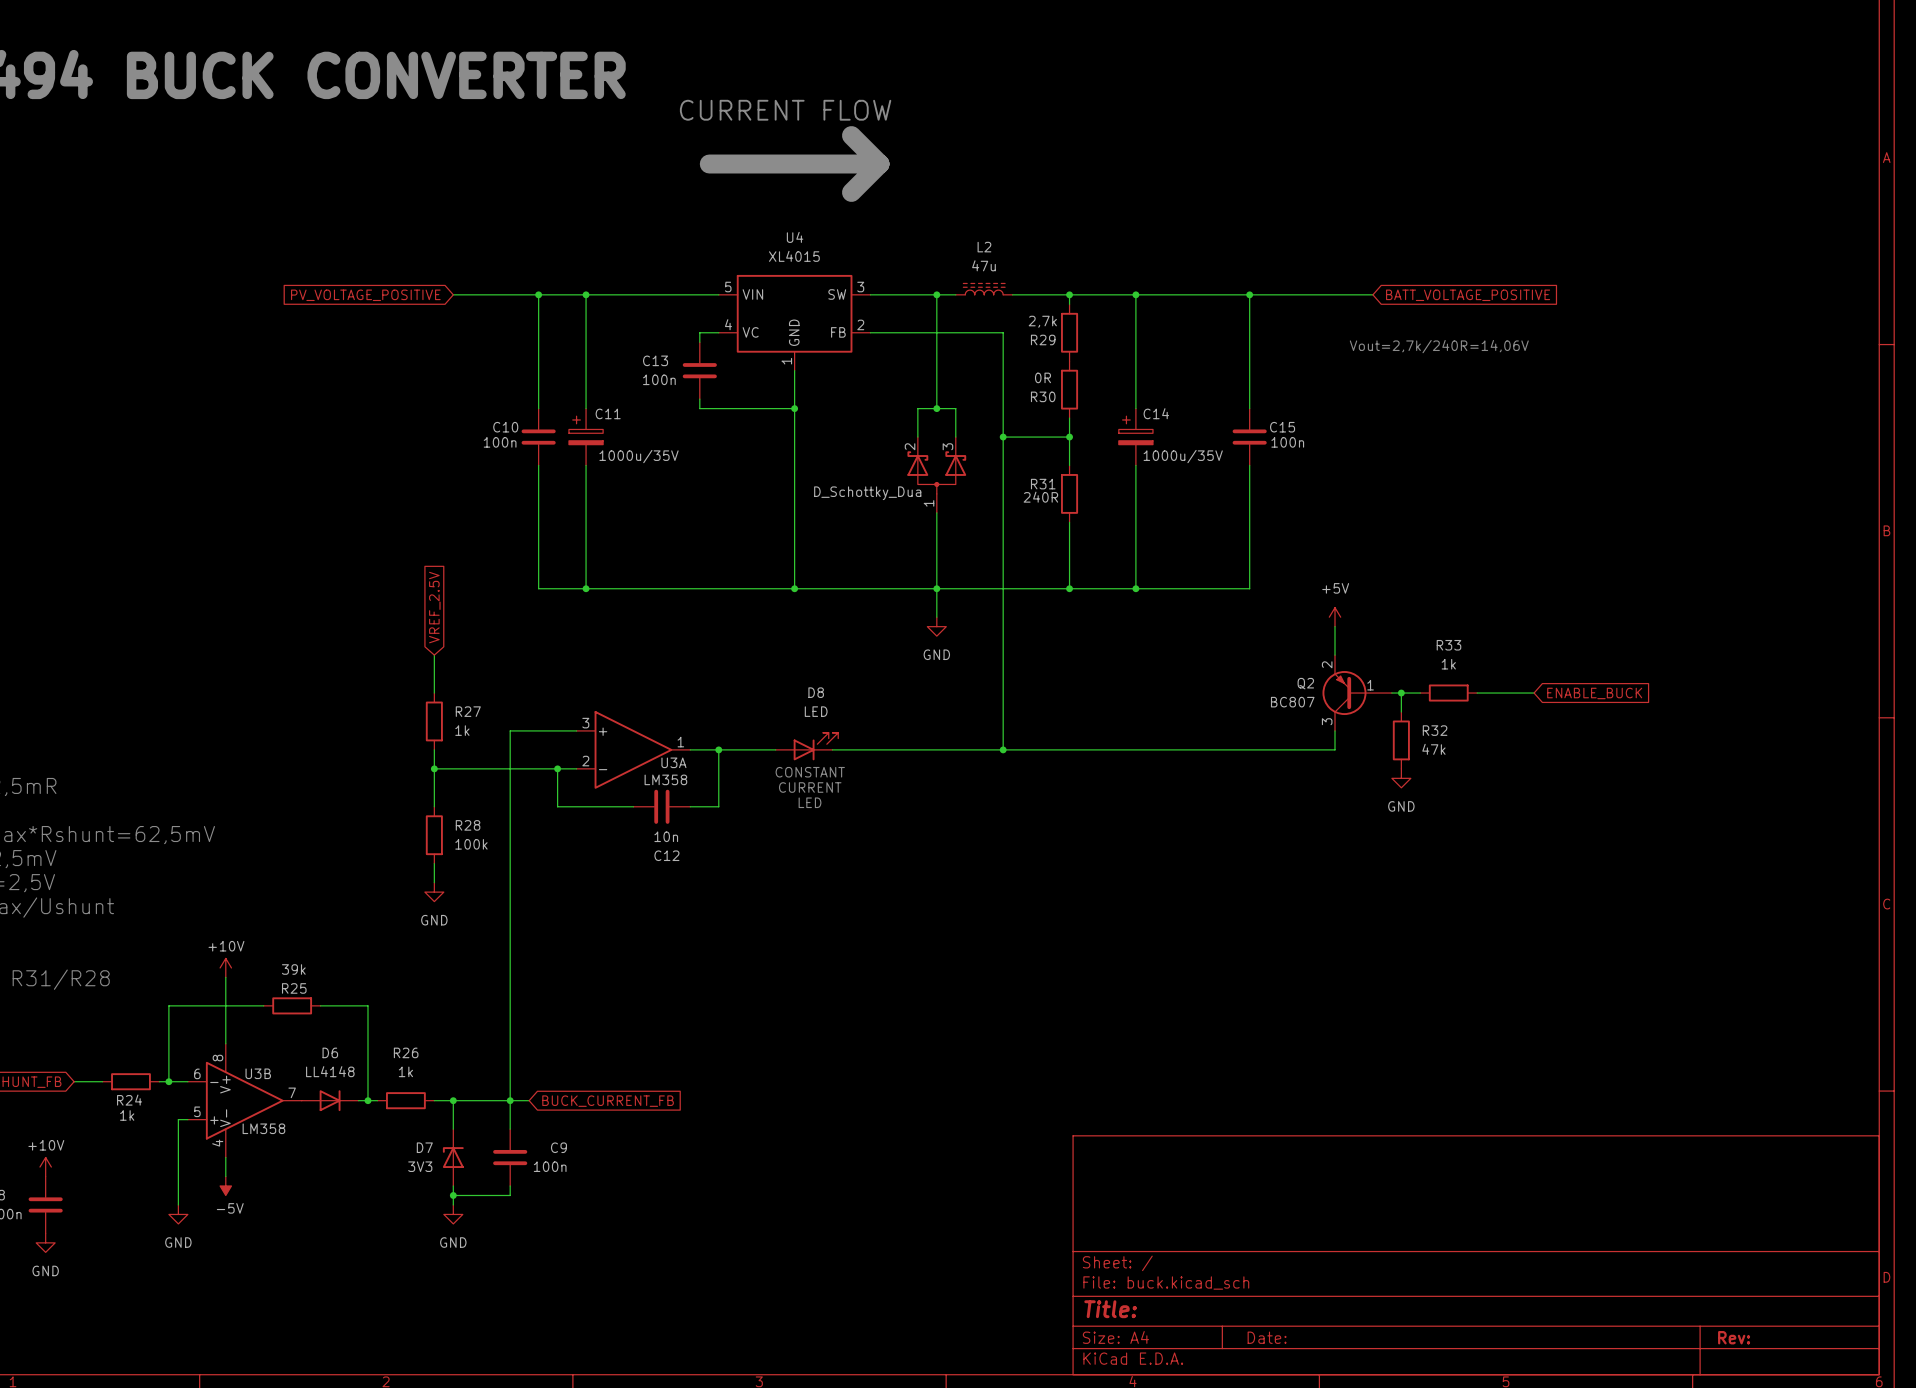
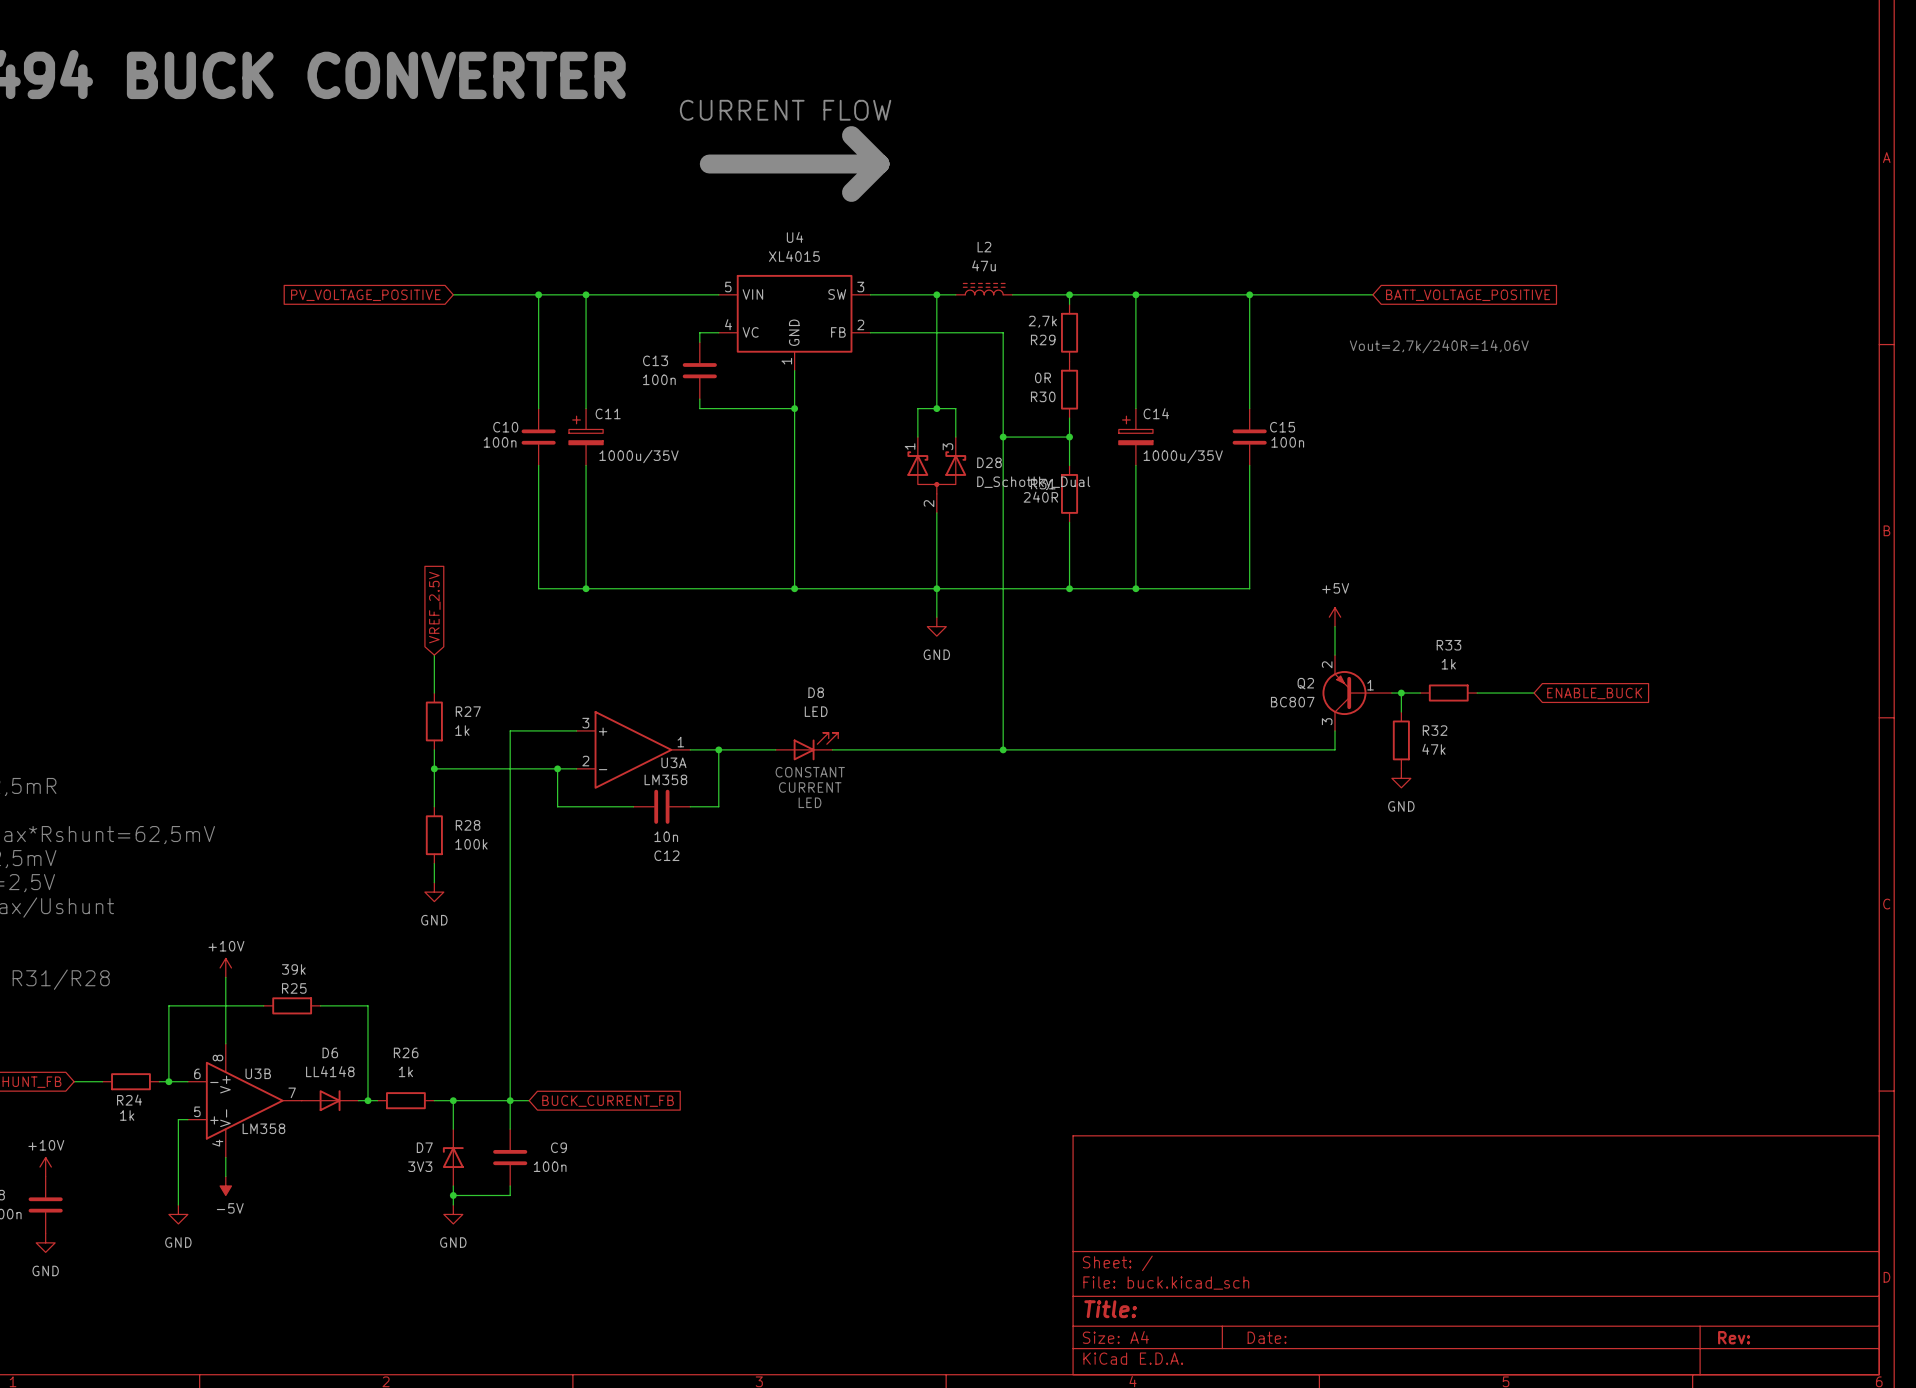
D28 pin number: 2 (910, 446) -> 1 (910, 446)
D28 name: none -> D28 (989, 462)
D28 value: D_Schottky_Dua (867, 493) -> D_Schottky_Dual (1033, 483)
D28 pin number: 1 (929, 503) -> 2 (929, 503)

